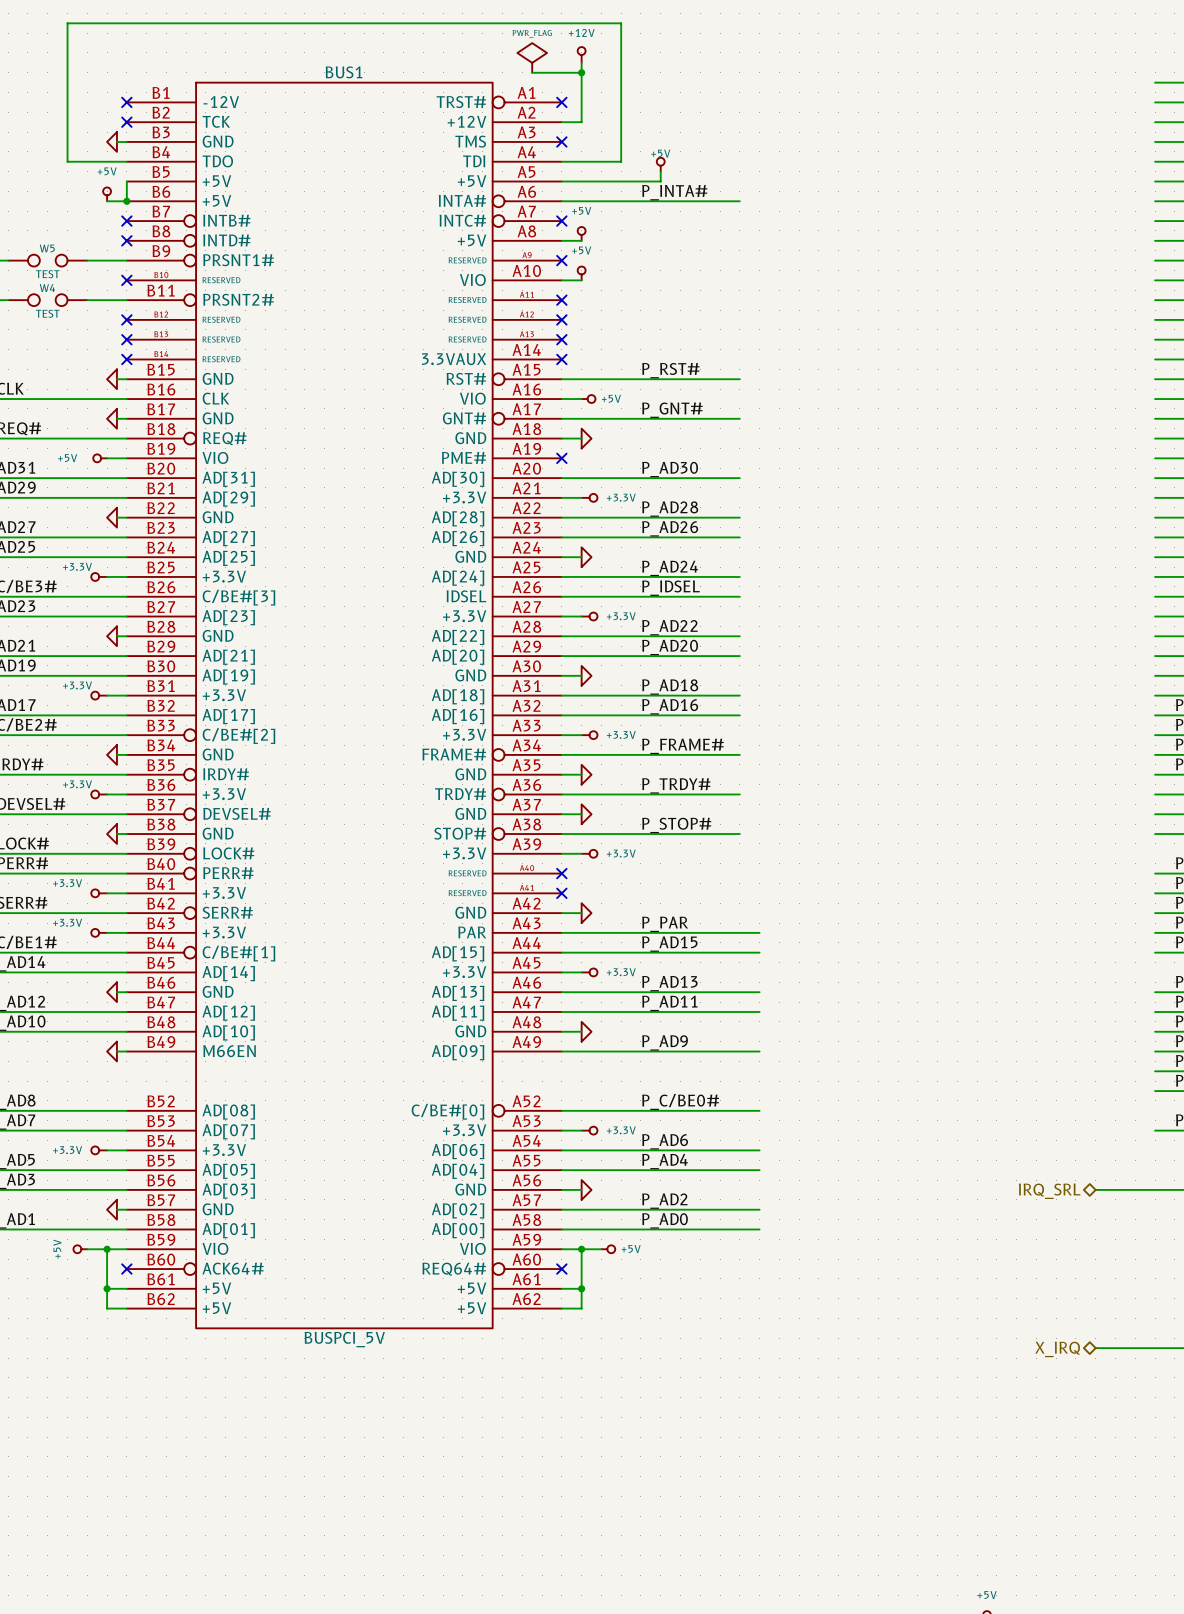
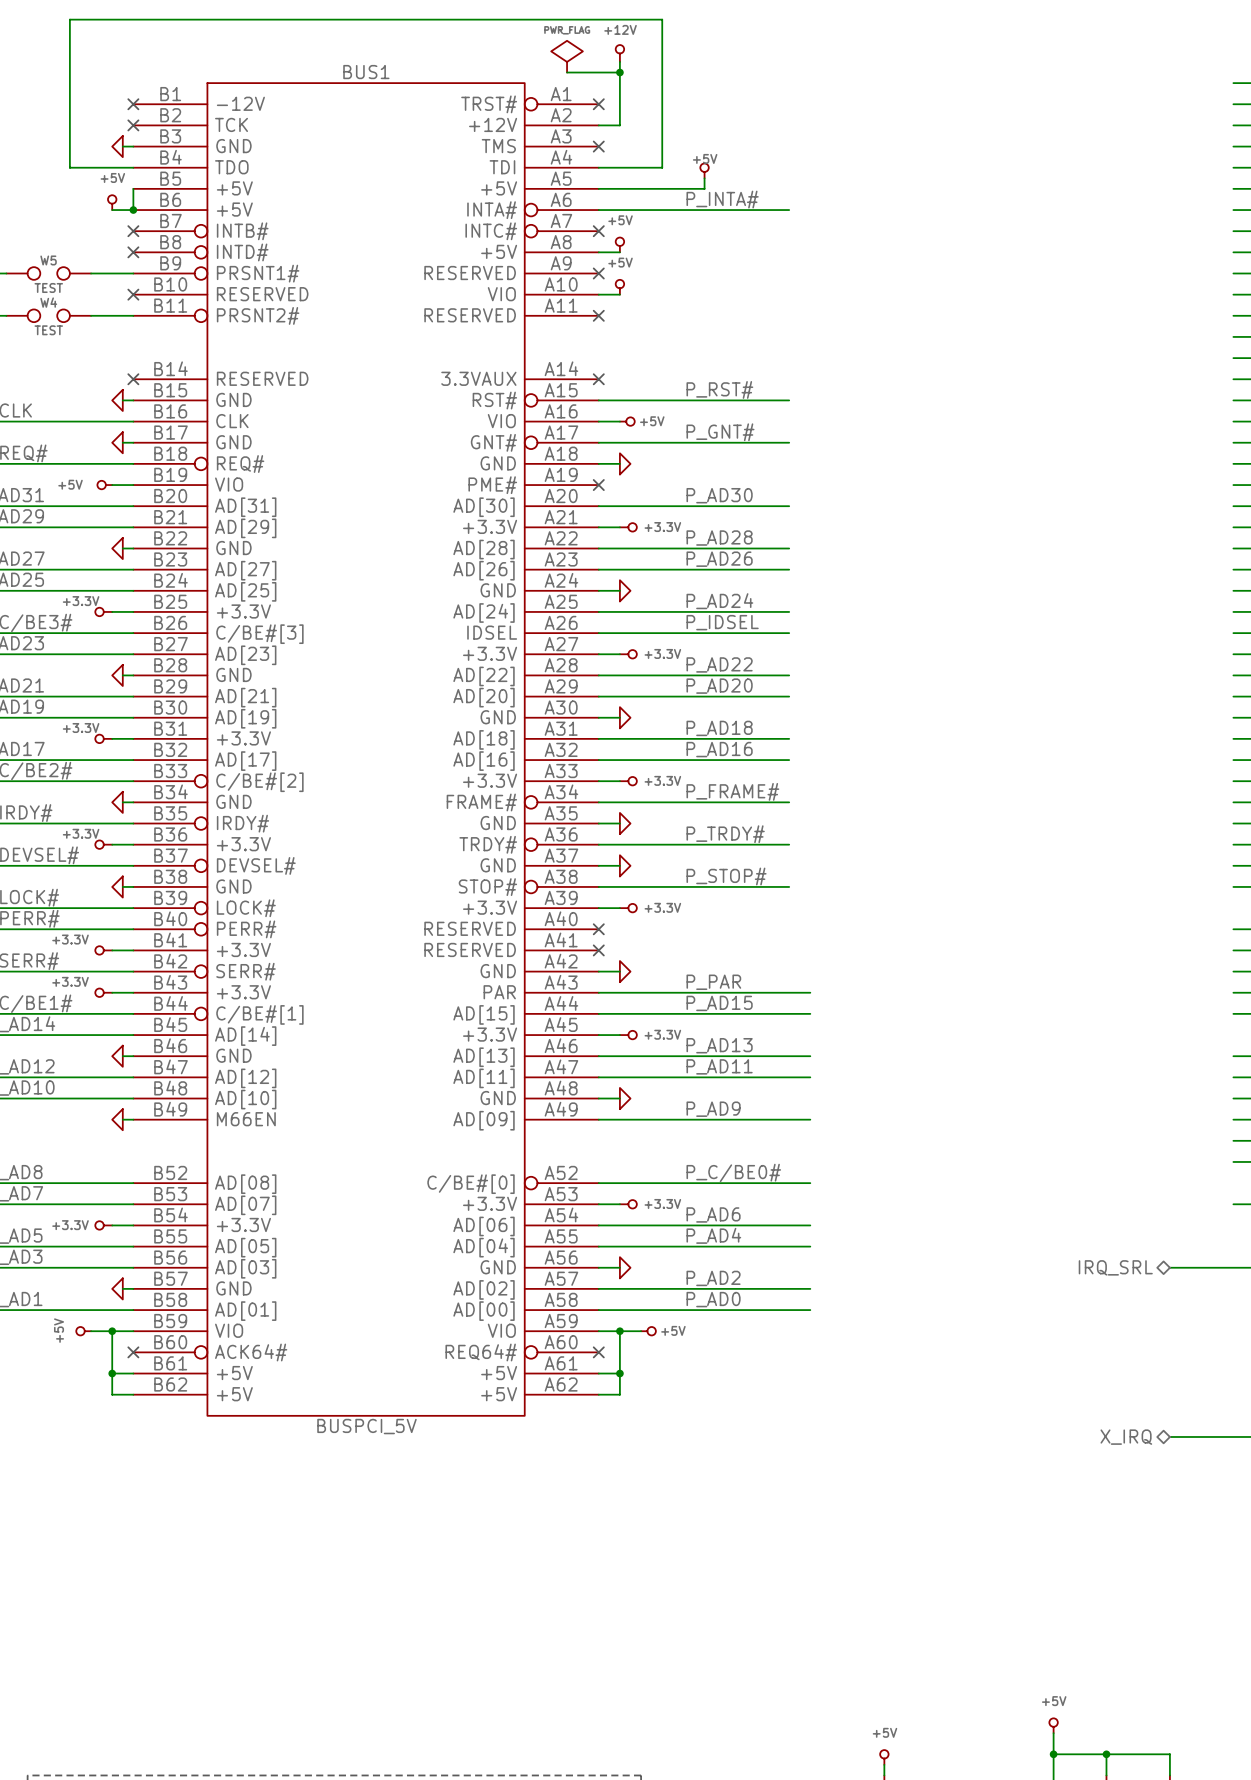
BUS1 symbol: [126, 82, 562, 1329] -> [133, 83, 599, 1416]
no-connect mark: (126, 319) -> none
no-connect mark: (561, 319) -> none
no-connect mark: (126, 339) -> none
no-connect mark: (561, 339) -> none

